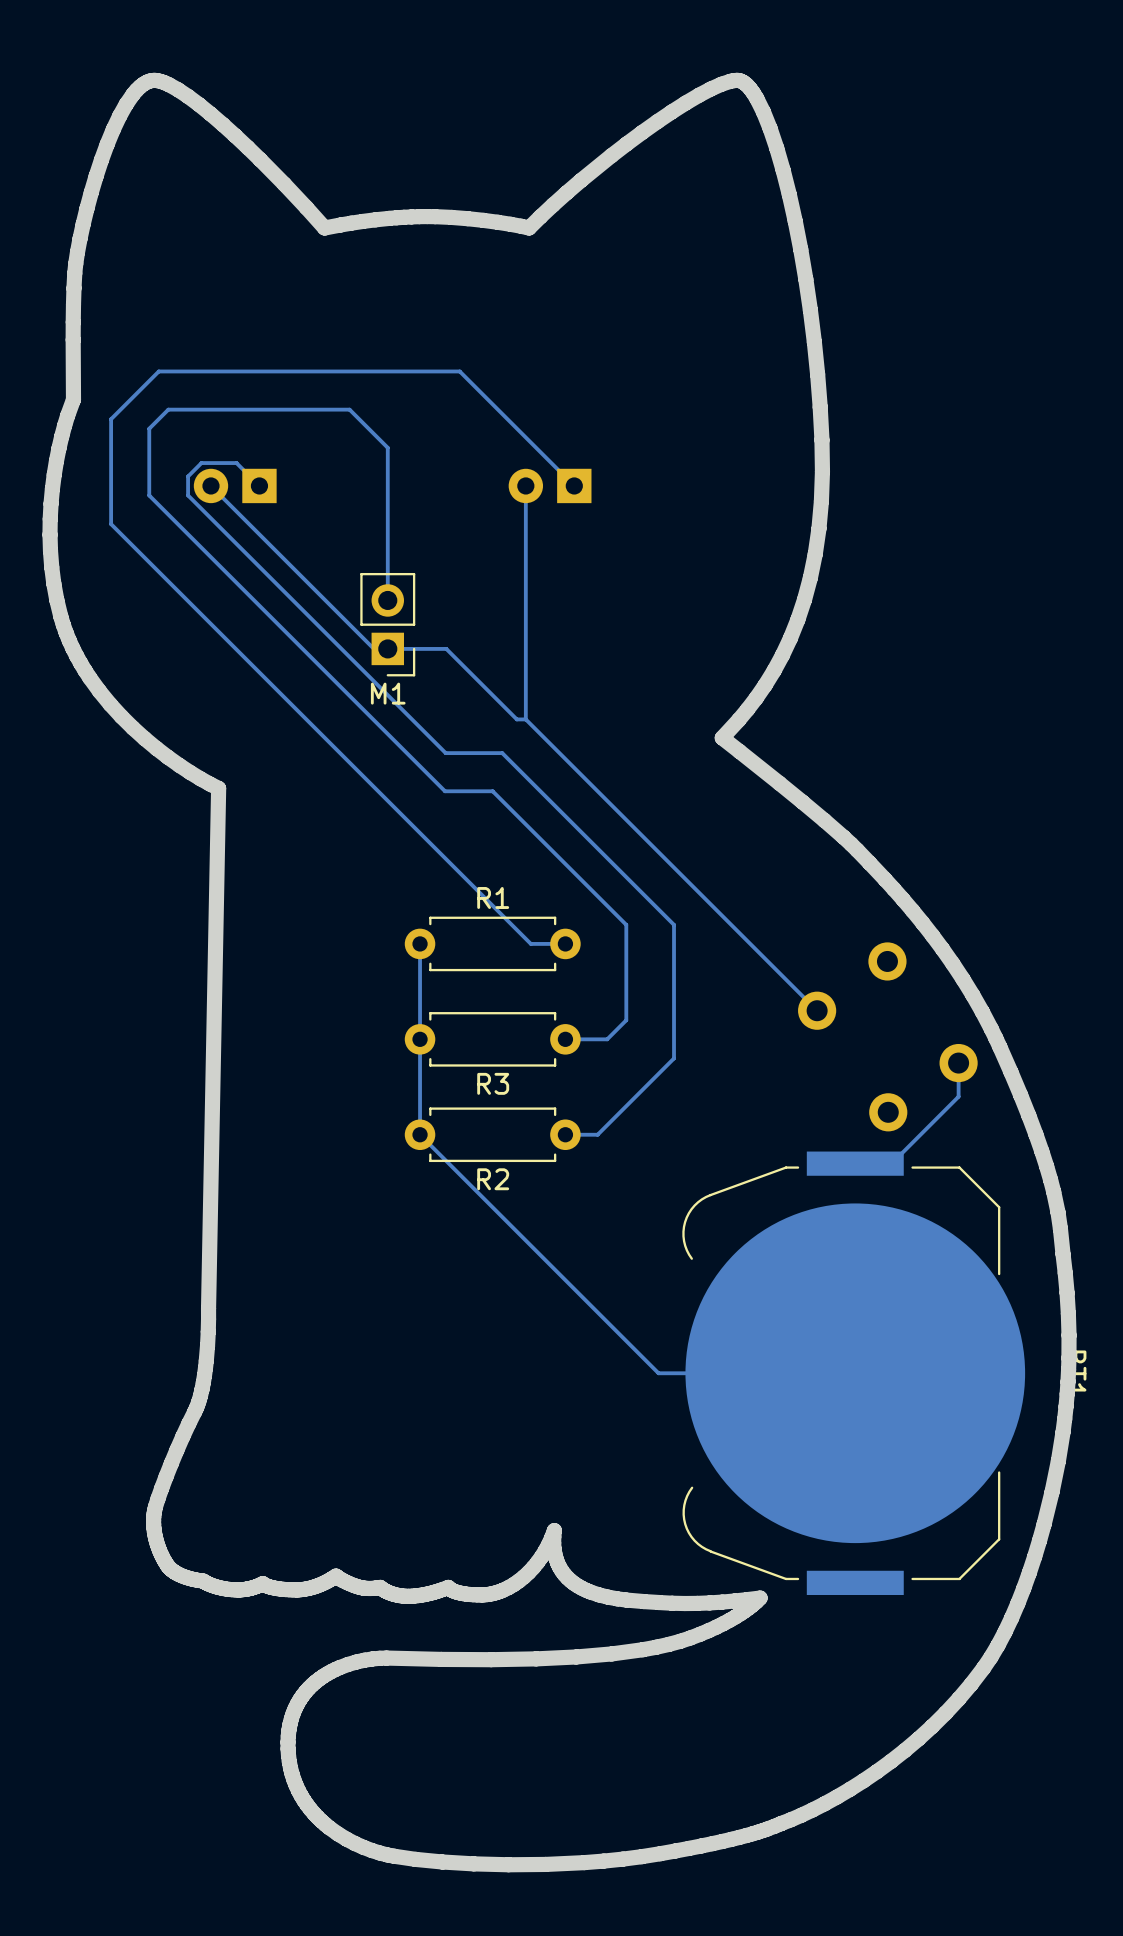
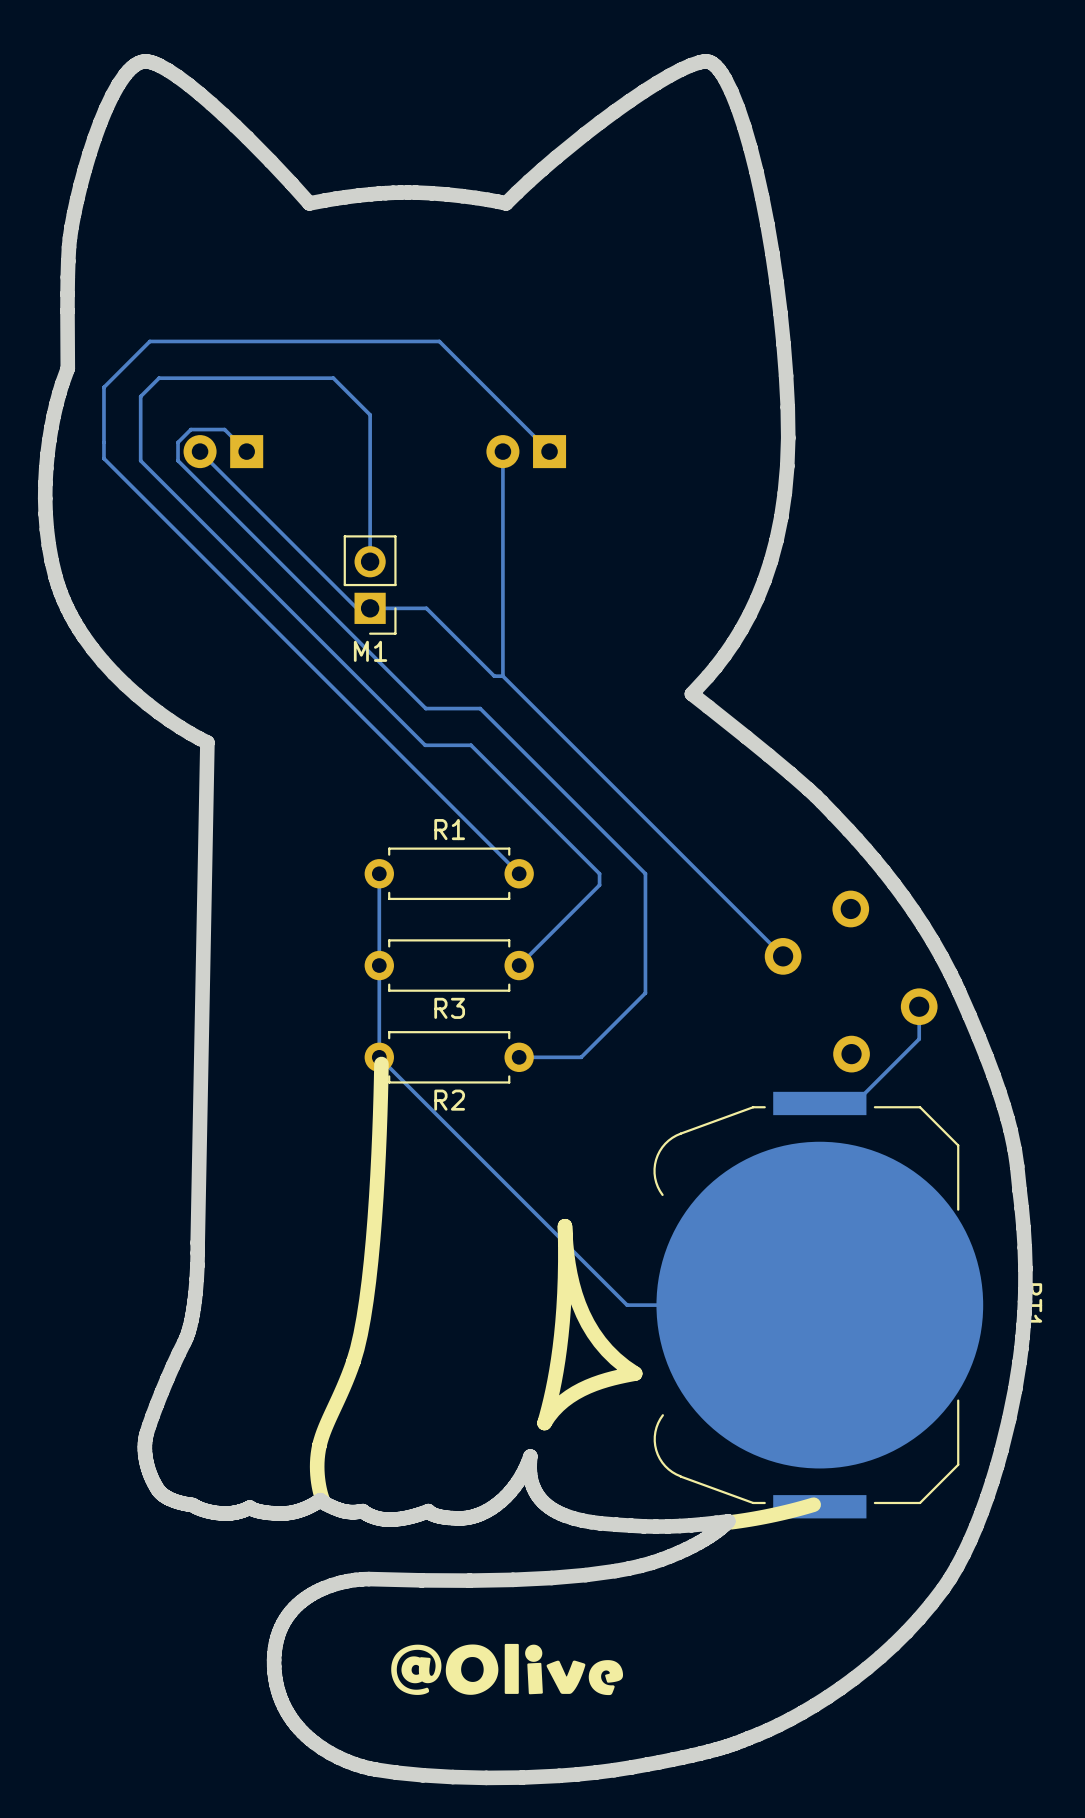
bottom track: (111, 493) (111, 524) (530, 943) (565, 943) -> (103, 458) (519, 873)
bottom track: (626, 936) (626, 1020) (607, 1039) (565, 1039) -> (599, 885) (519, 965)
bottom track: (420, 943) (420, 1134) (658, 1373) -> (379, 873) (379, 1057) (627, 1305) (630, 1305)
R1 position: (492, 943) -> (449, 873)
R3 position: (492, 1039) -> (449, 965)
bottom track: (674, 1048) (674, 1058) (597, 1134) (565, 1134) -> (645, 993) (581, 1057) (519, 1057)
line: none -> (381, 1063) (376, 1197) (366, 1300) (353, 1361) (319, 1445) (317, 1474) (323, 1501)
R2 position: (492, 1134) -> (449, 1057)
line: none -> (564, 1226) (570, 1274) (582, 1313) (593, 1332) (607, 1350) (635, 1373) (600, 1381) (575, 1392) (558, 1405) (544, 1423) (554, 1381) (561, 1335) (565, 1278) (564, 1226)
line: none -> (813, 1504) (770, 1515) (731, 1522)
drawing: none -> [391, 1643, 624, 1696]

